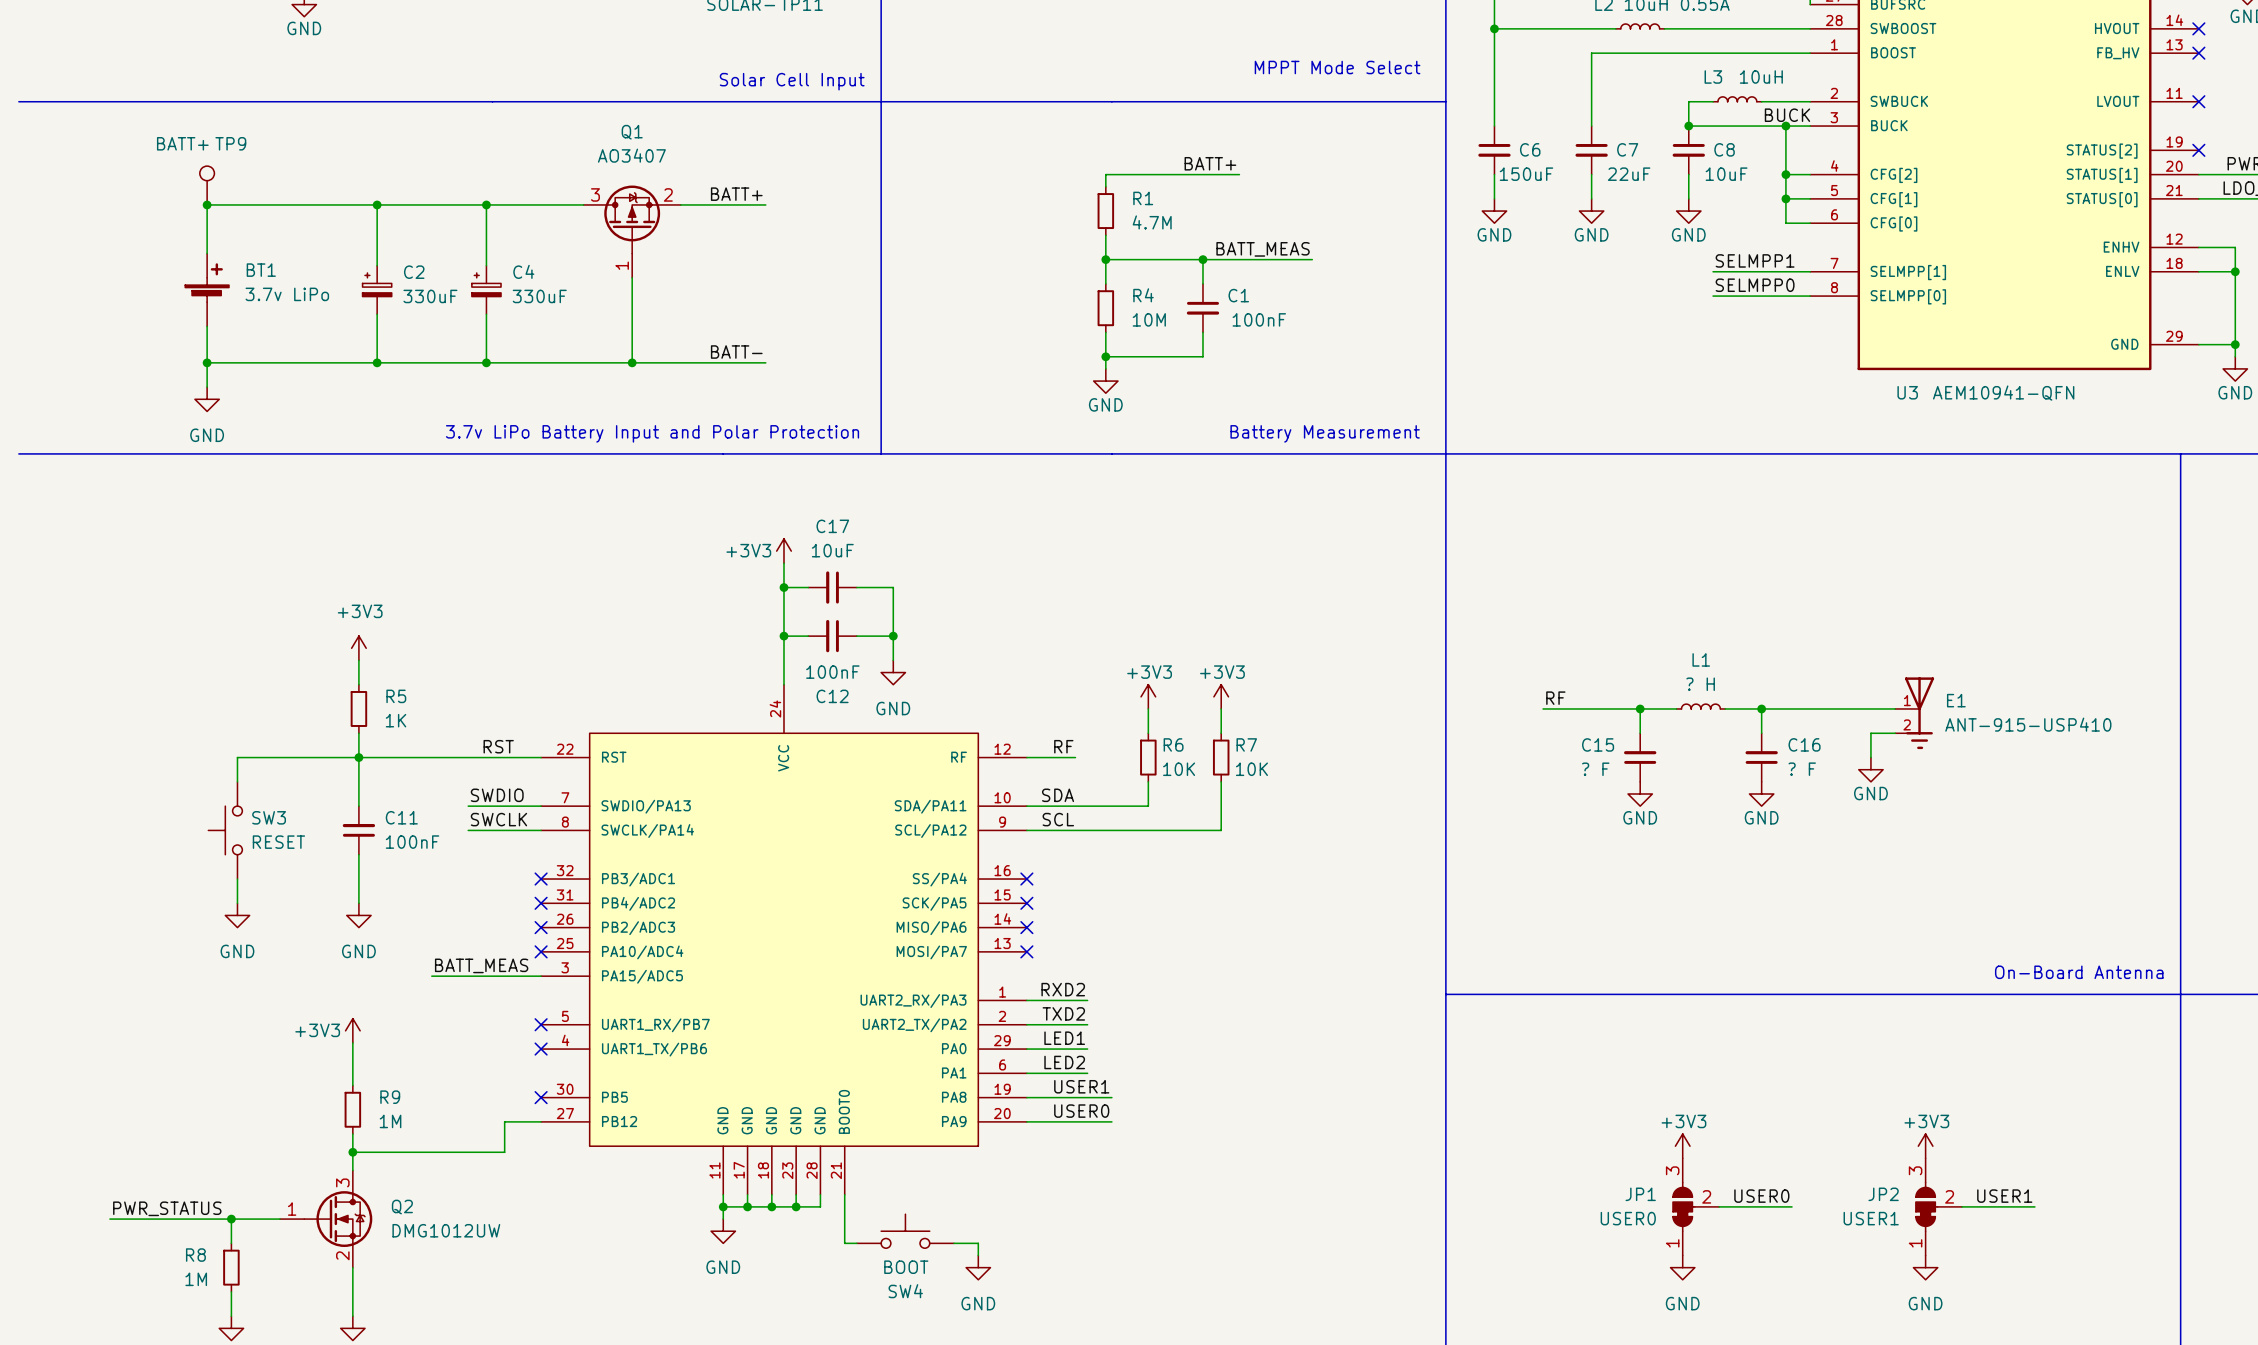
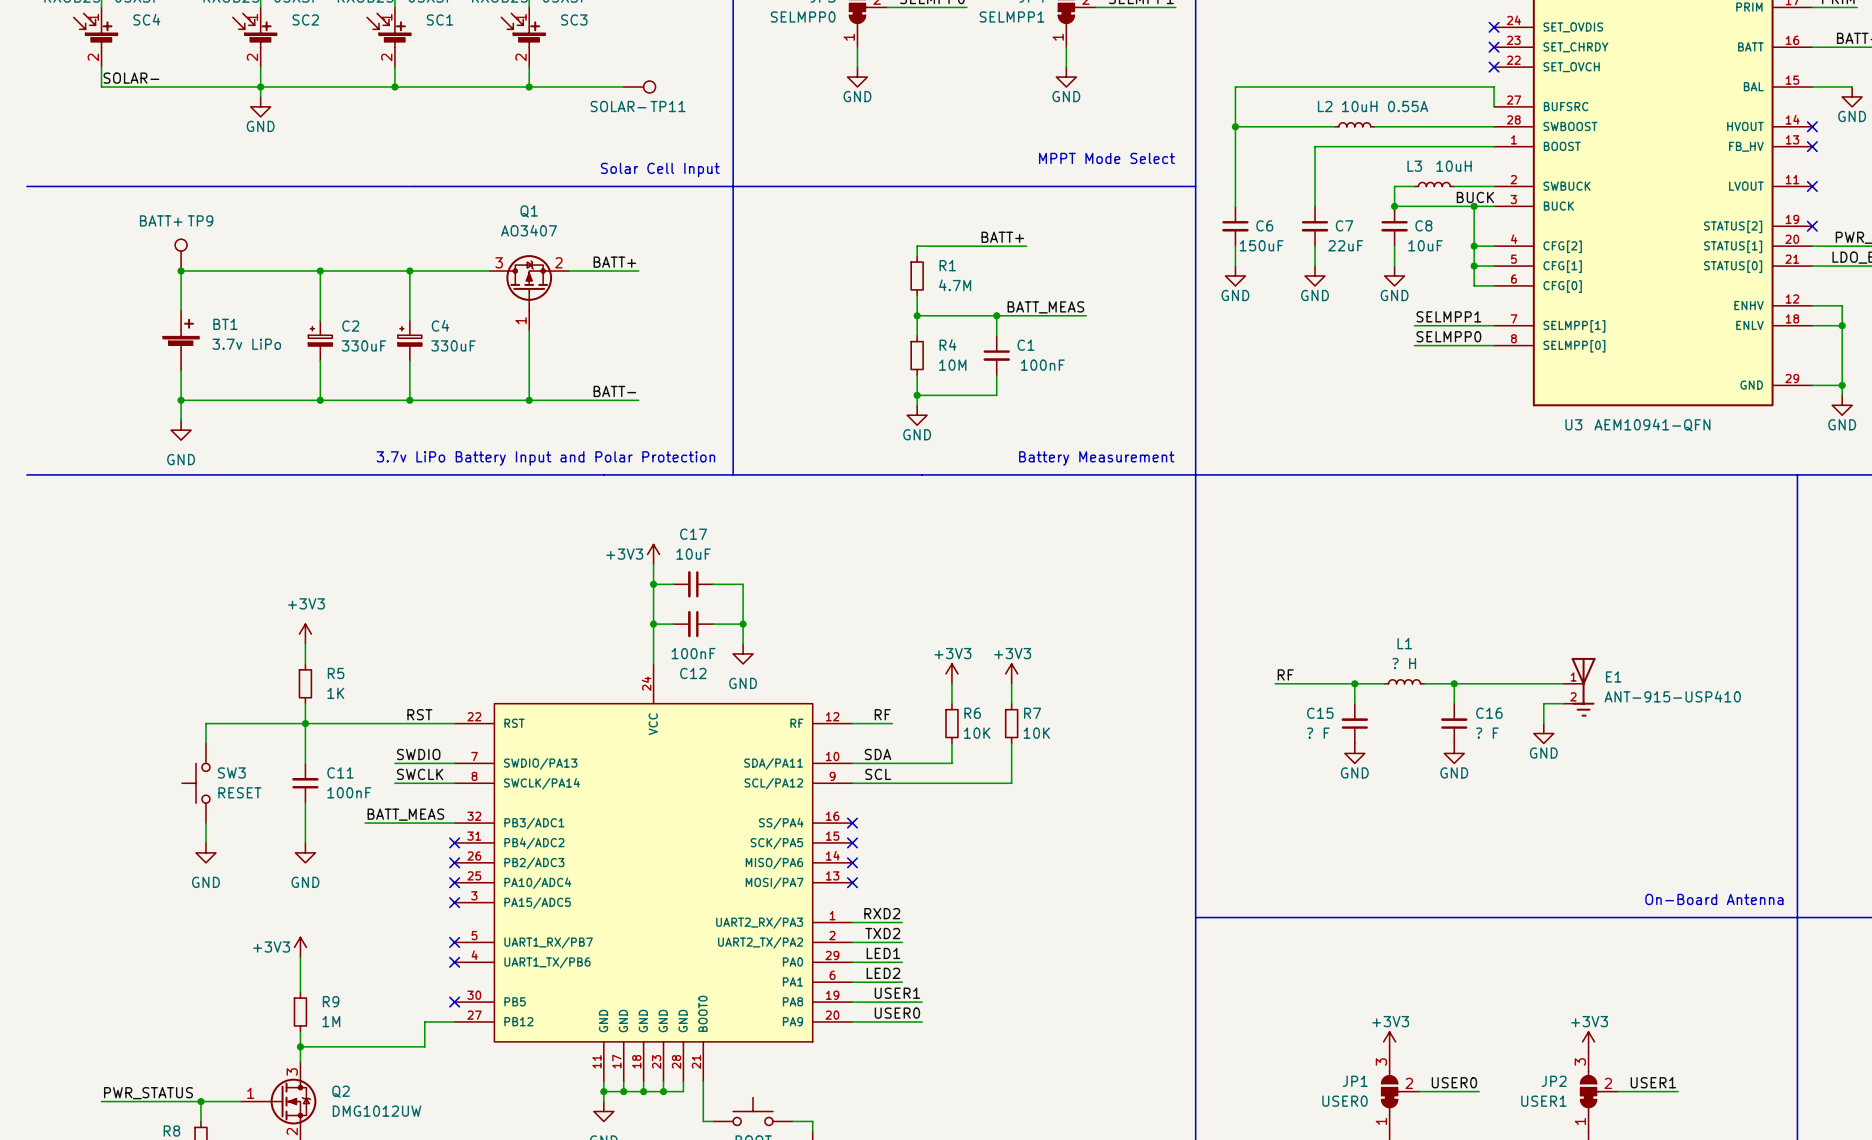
no-connect mark: (541, 879) -> none
label position: BATT_MEAS (481, 965) -> BATT_MEAS (405, 814)
wire: (431, 976) (541, 976) -> (365, 823) (454, 823)
no-connect mark: none -> (454, 902)

